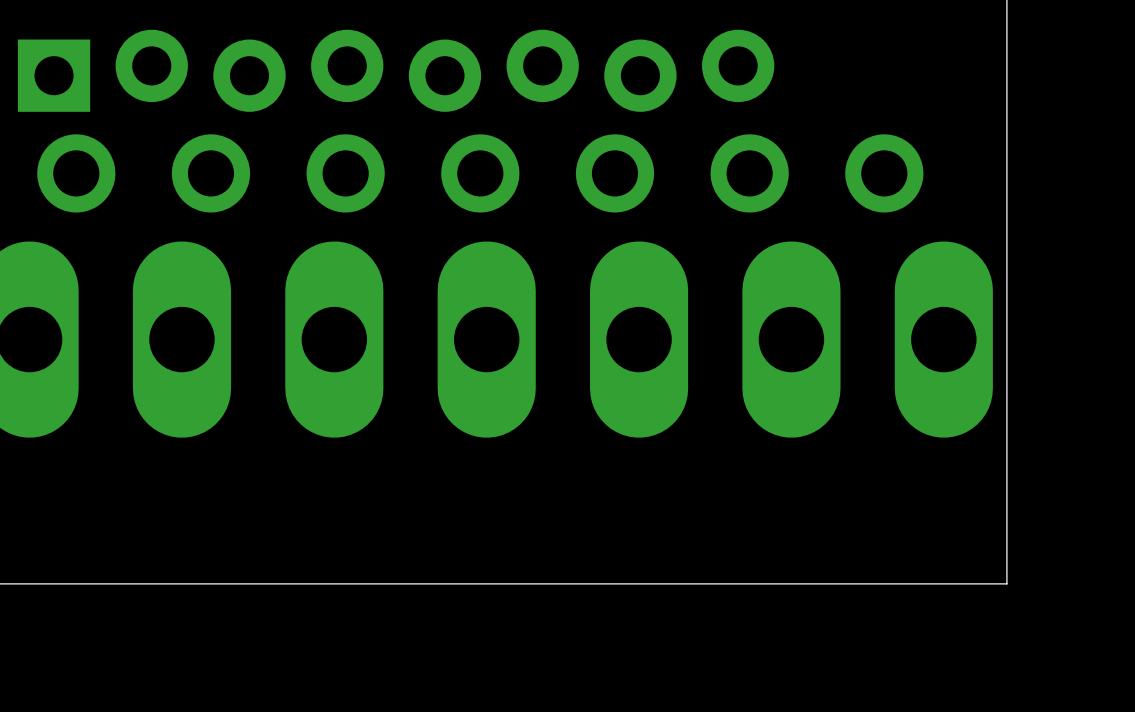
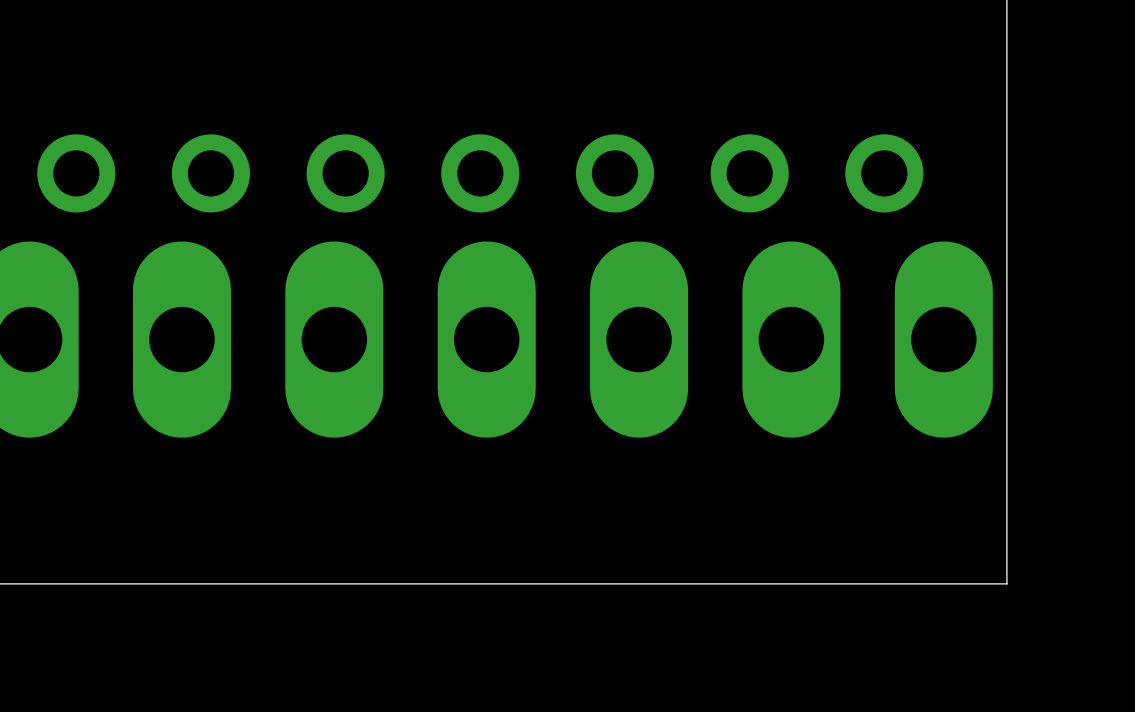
part: (396, 70) -> none

